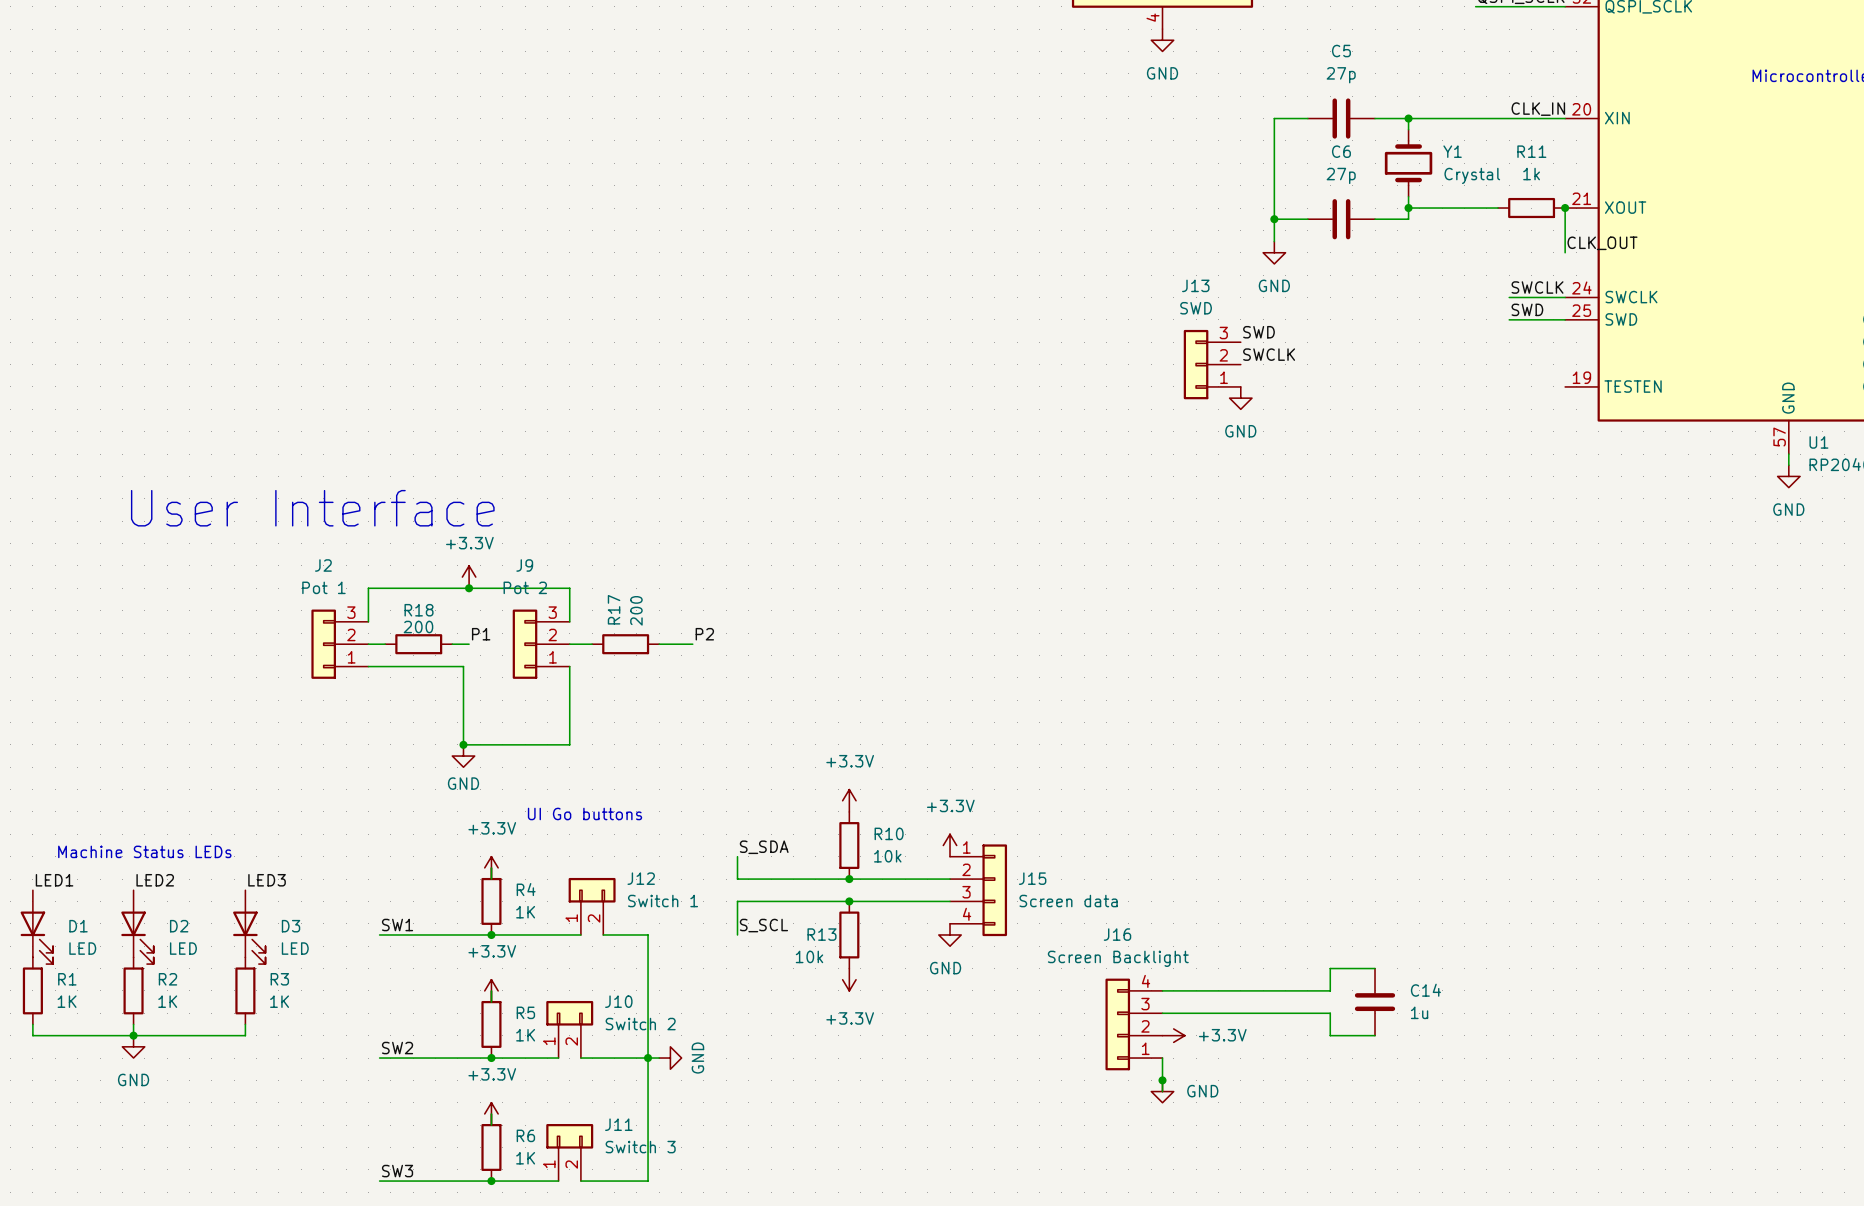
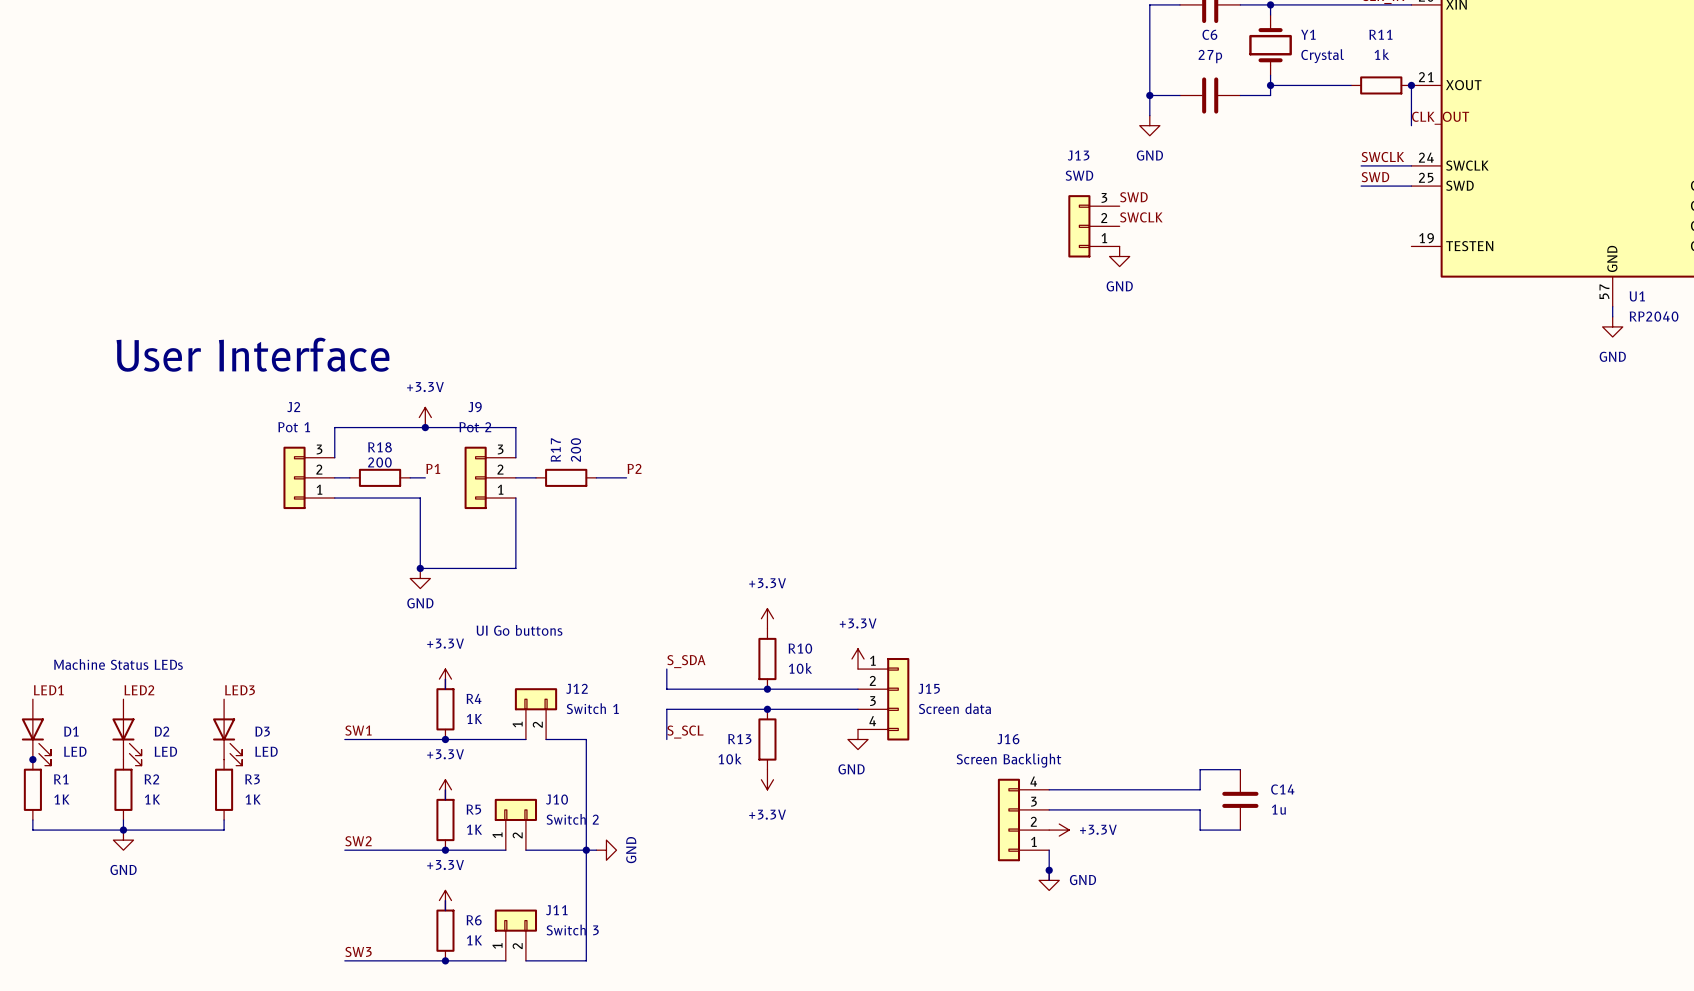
junction: none -> (32, 759)

